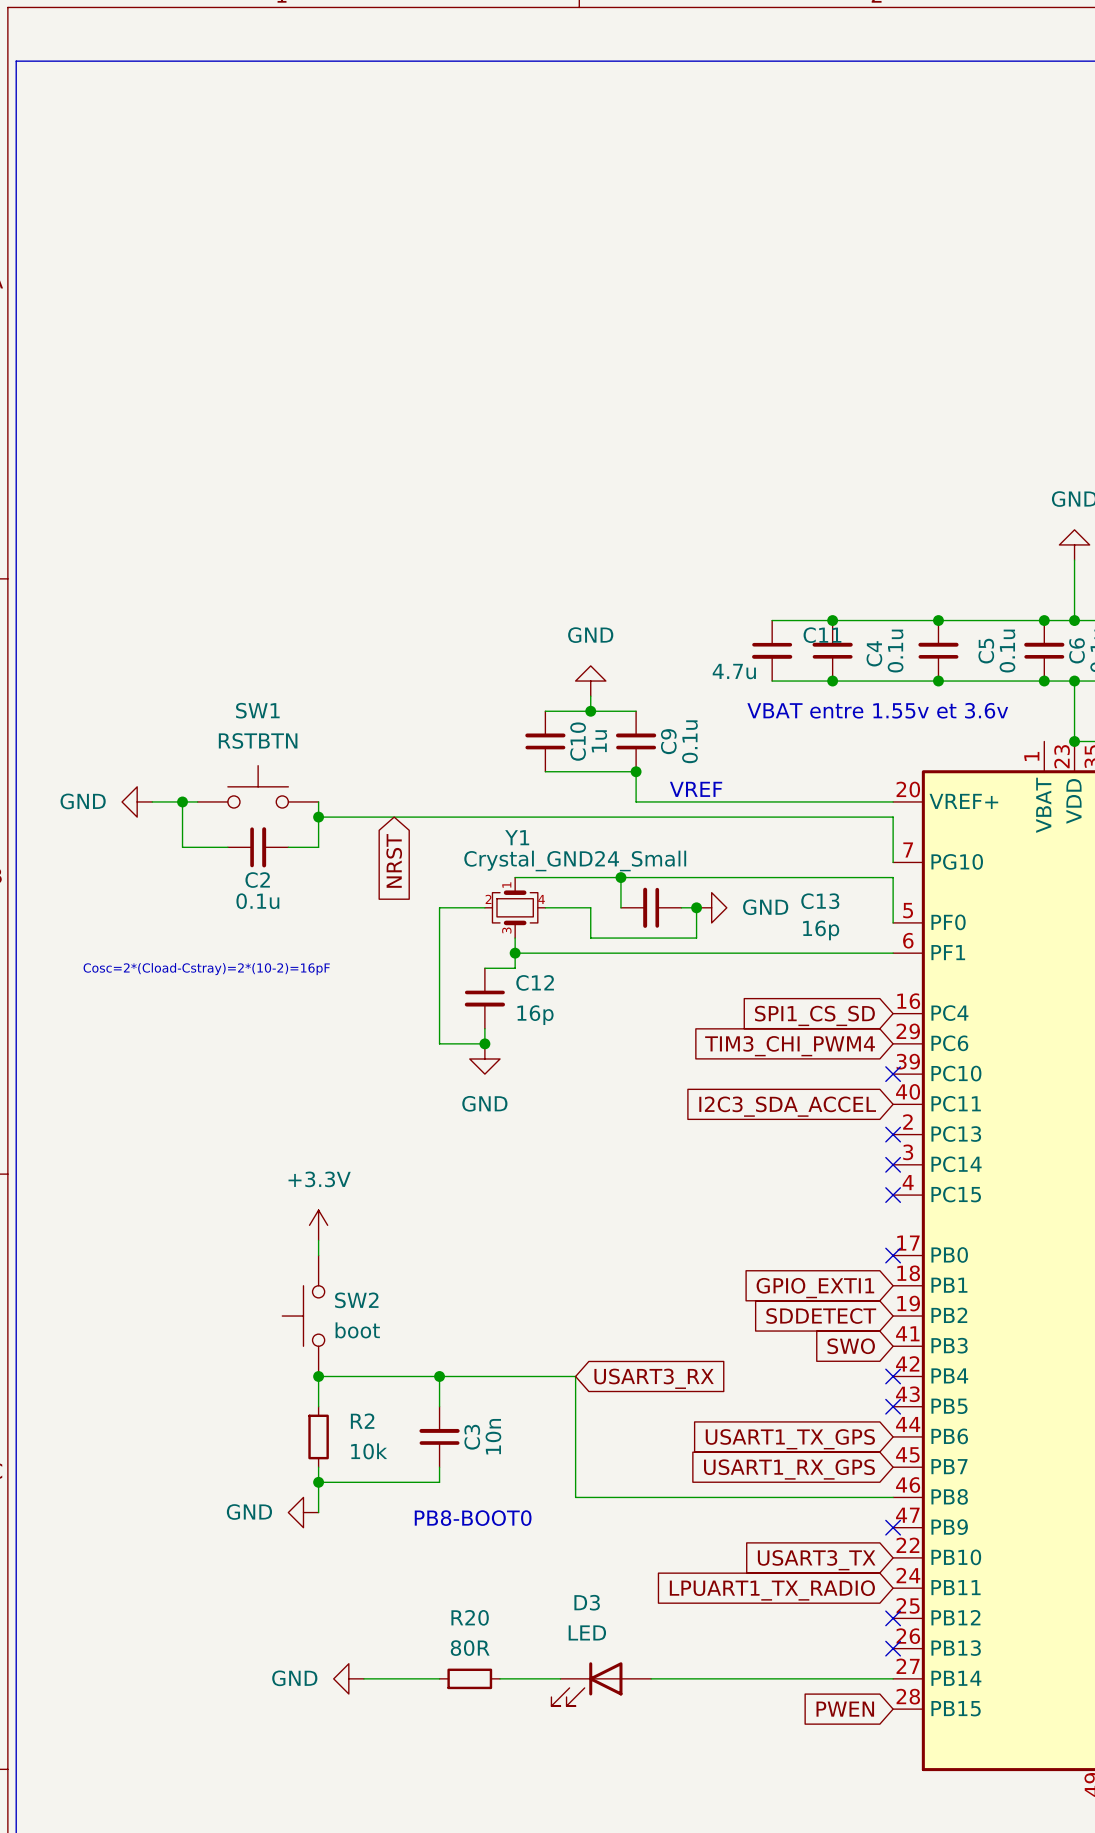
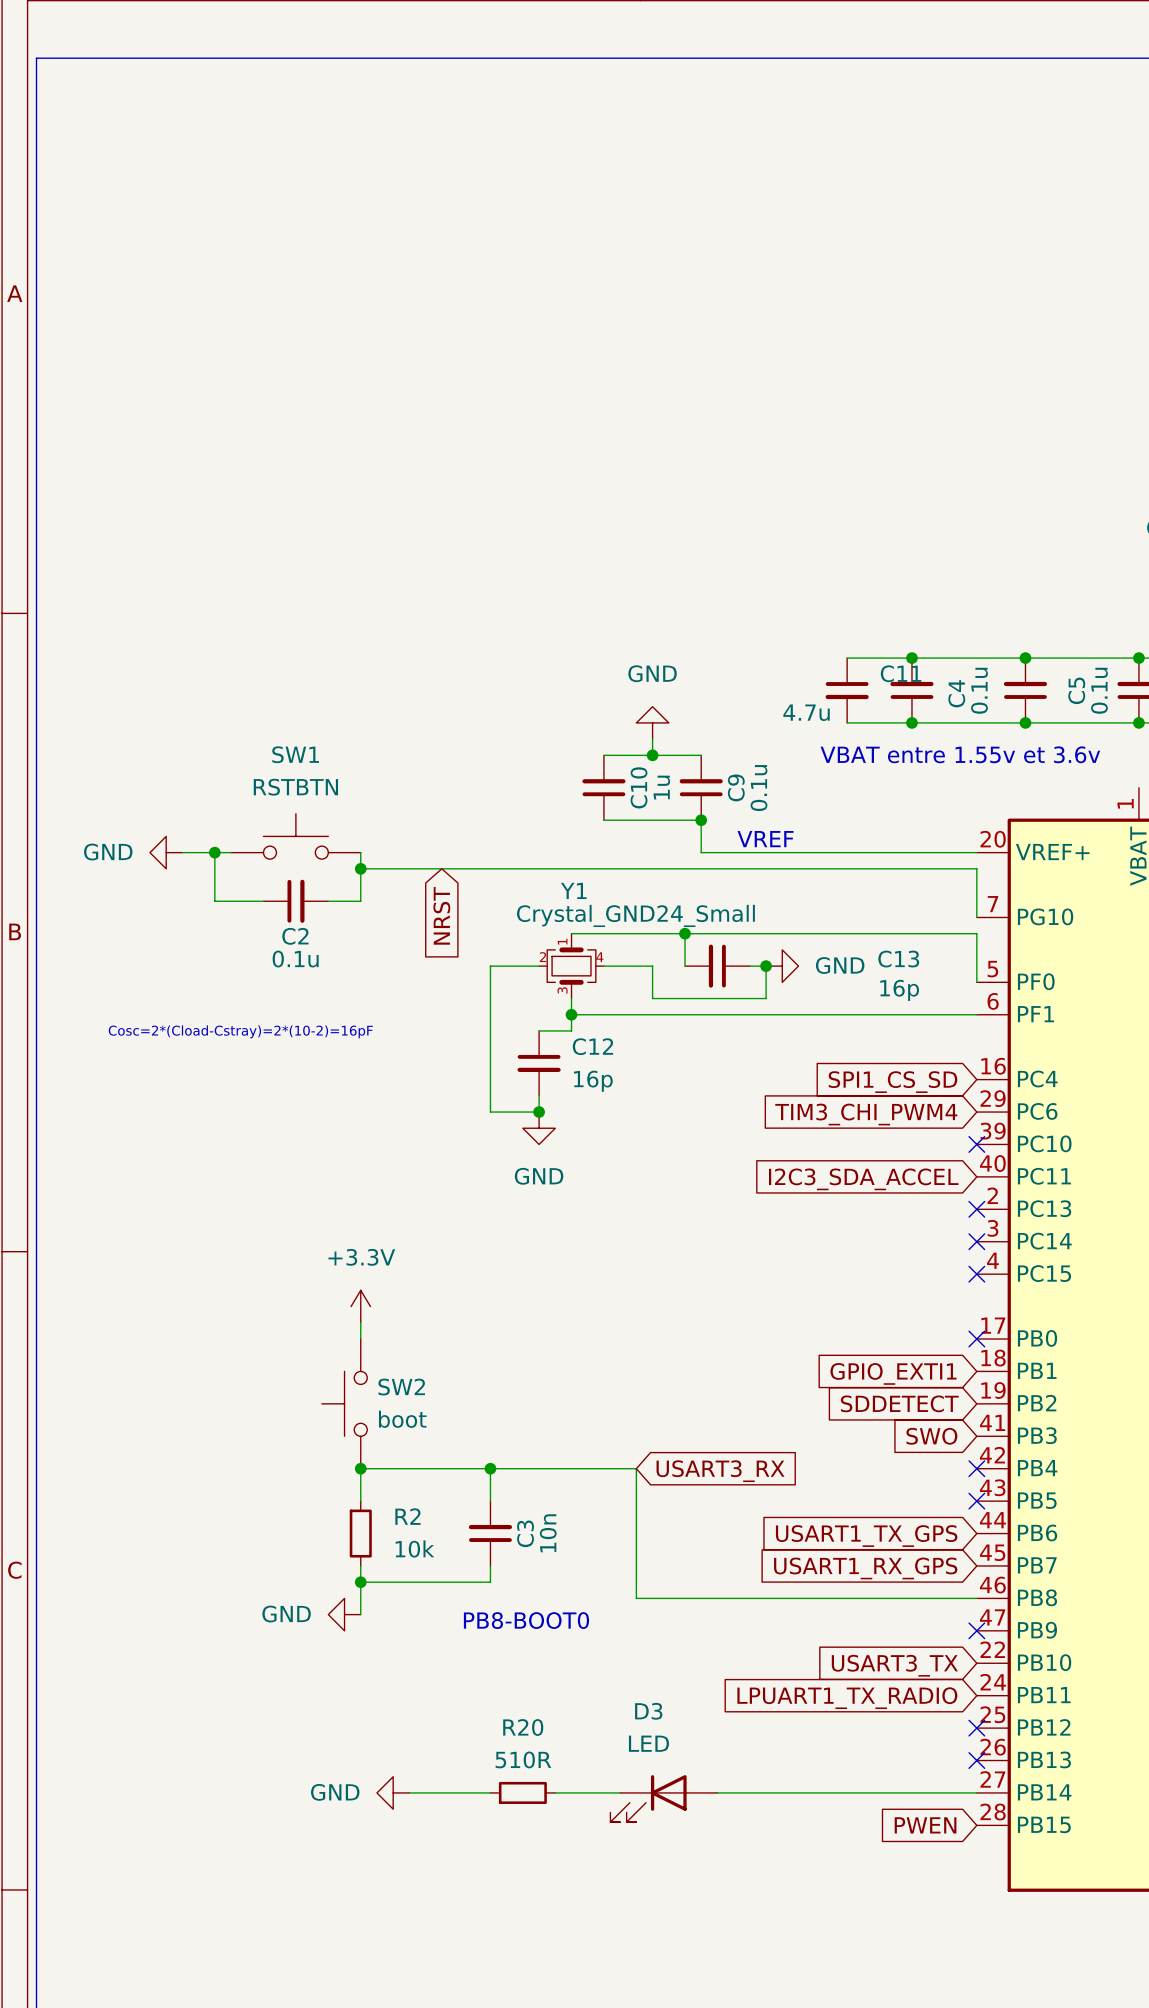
R20 value: 80R (470, 1648) -> 510R (523, 1759)

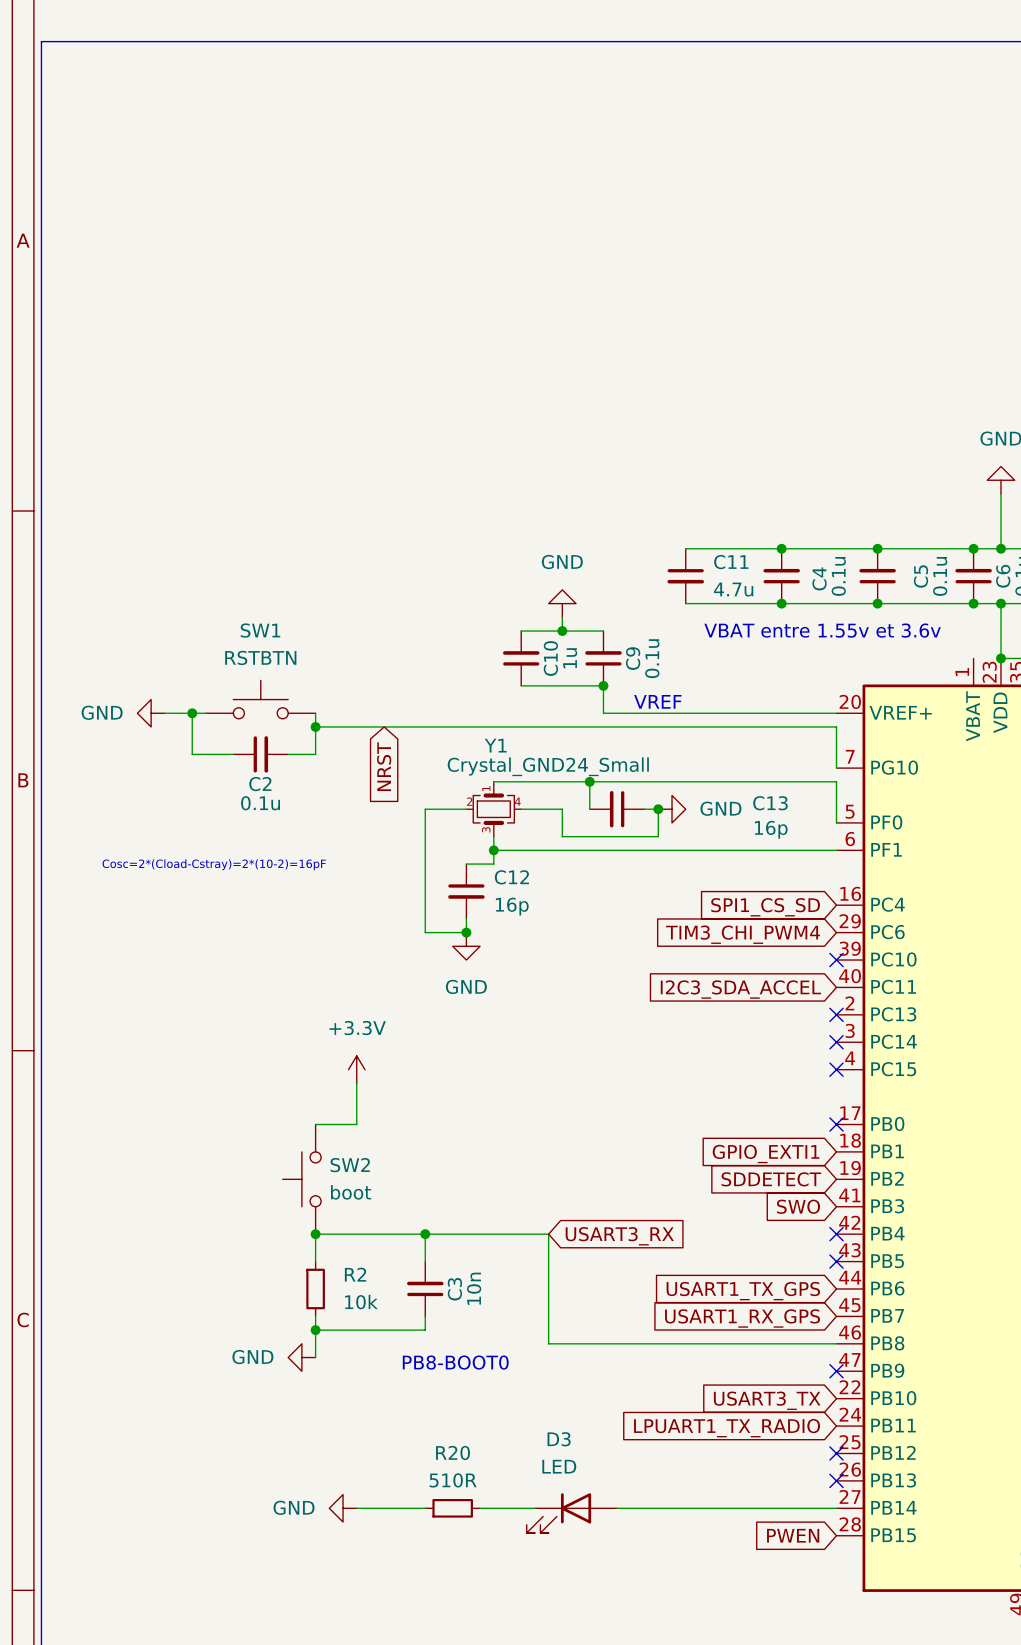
wire: none -> (685, 548) (726, 548)
C11 position: (847, 690) -> (685, 576)
C11 value position: 4.7u (806, 712) -> 4.7u (733, 589)
wire: none -> (685, 603) (726, 603)
power symbol position: +3.3V (360, 1306) -> +3.3V (356, 1069)
wire: (360, 1322) (360, 1339) -> (356, 1083) (356, 1124) (315, 1124)

